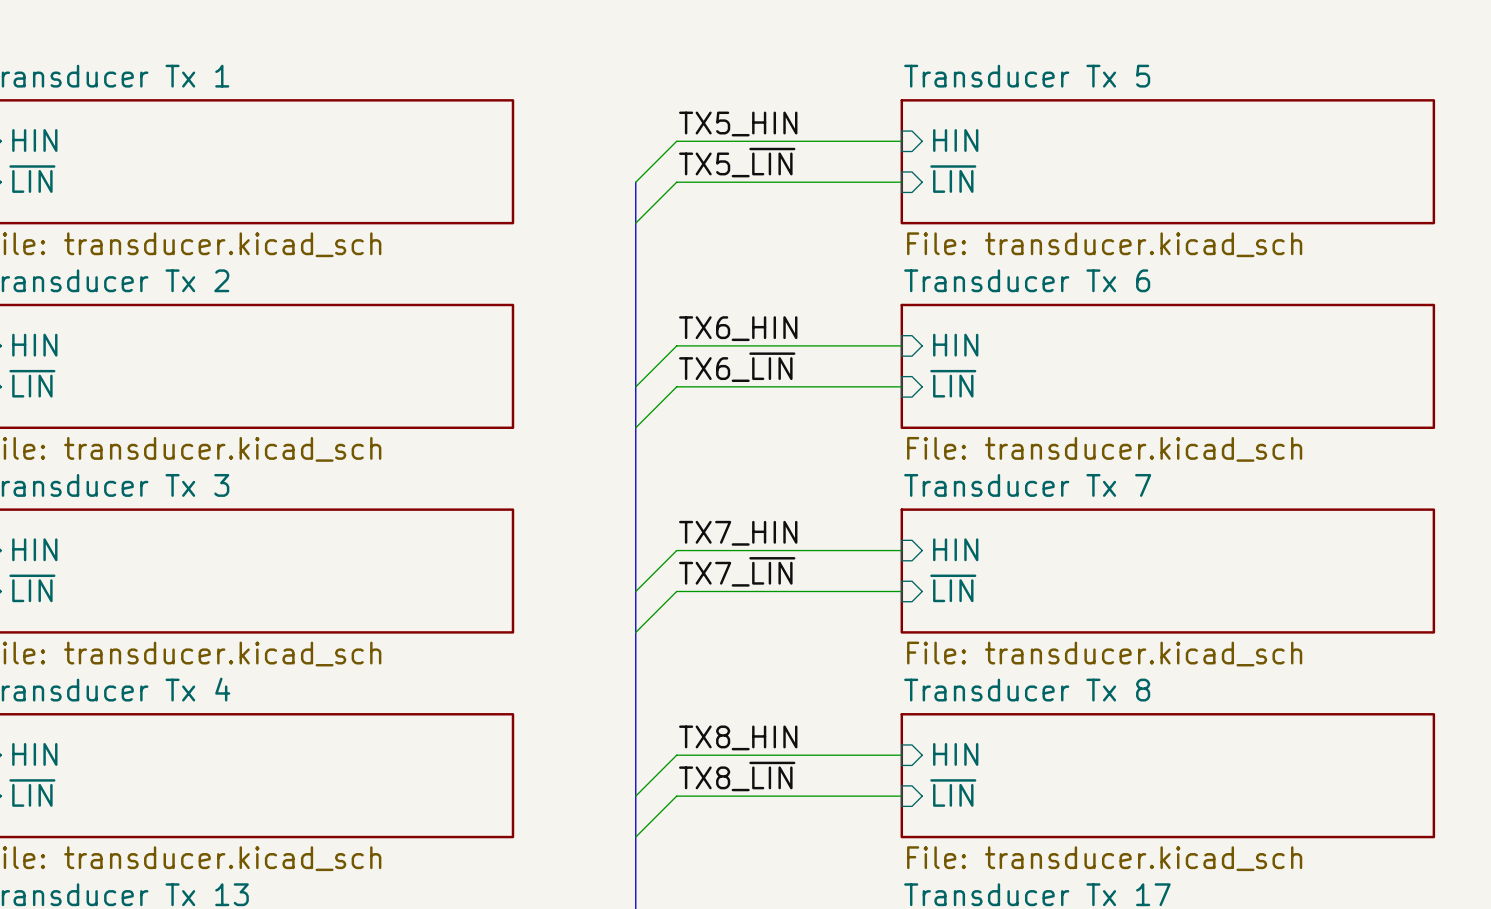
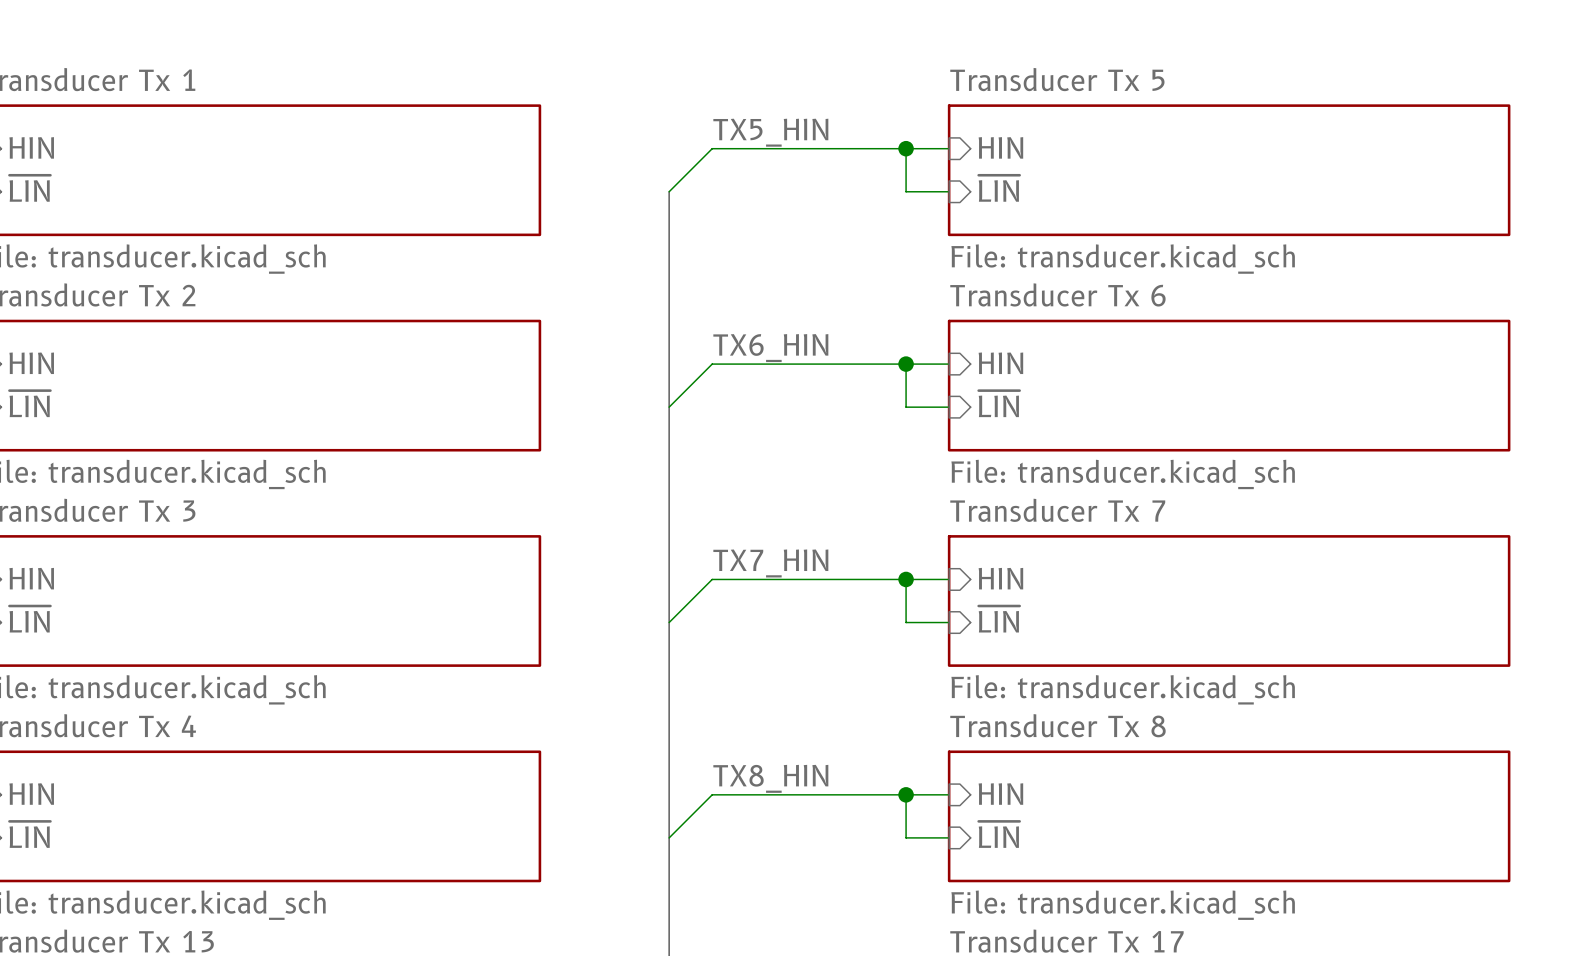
junction: none -> (906, 148)
label: TX5_~{LIN} (737, 162) -> none
wire: (860, 182) (676, 182) (635, 223) -> (906, 191) (906, 148)
junction: none -> (906, 364)
label: TX6_~{LIN} (737, 367) -> none
wire: (860, 386) (676, 386) (635, 427) -> (906, 407) (906, 364)
junction: none -> (906, 579)
label: TX7_~{LIN} (737, 571) -> none
wire: (860, 591) (676, 591) (635, 632) -> (906, 622) (906, 579)
junction: none -> (906, 794)
label: TX8_~{LIN} (737, 776) -> none
wire: (860, 796) (676, 796) (635, 837) -> (906, 837) (906, 794)

